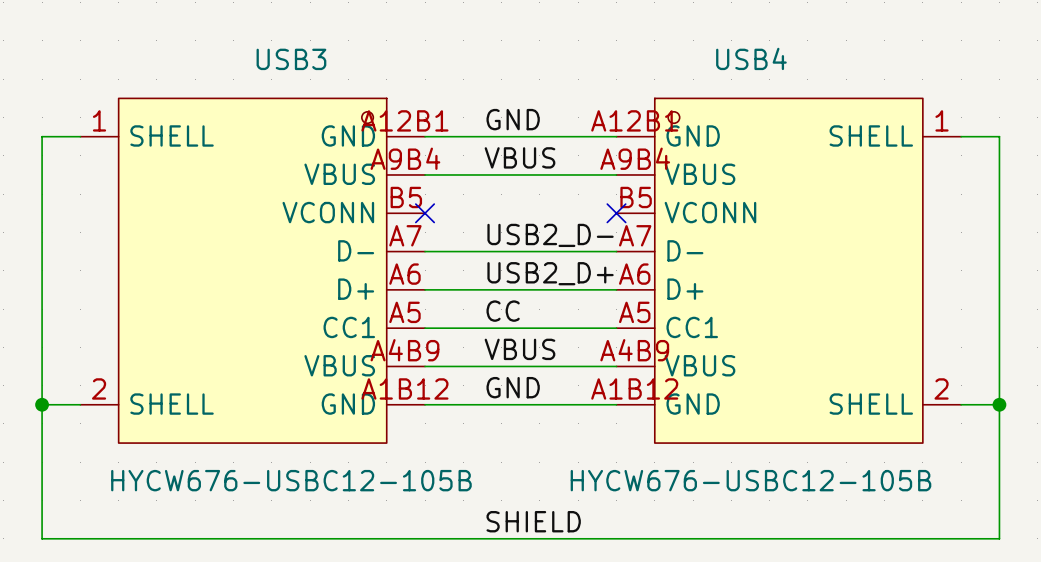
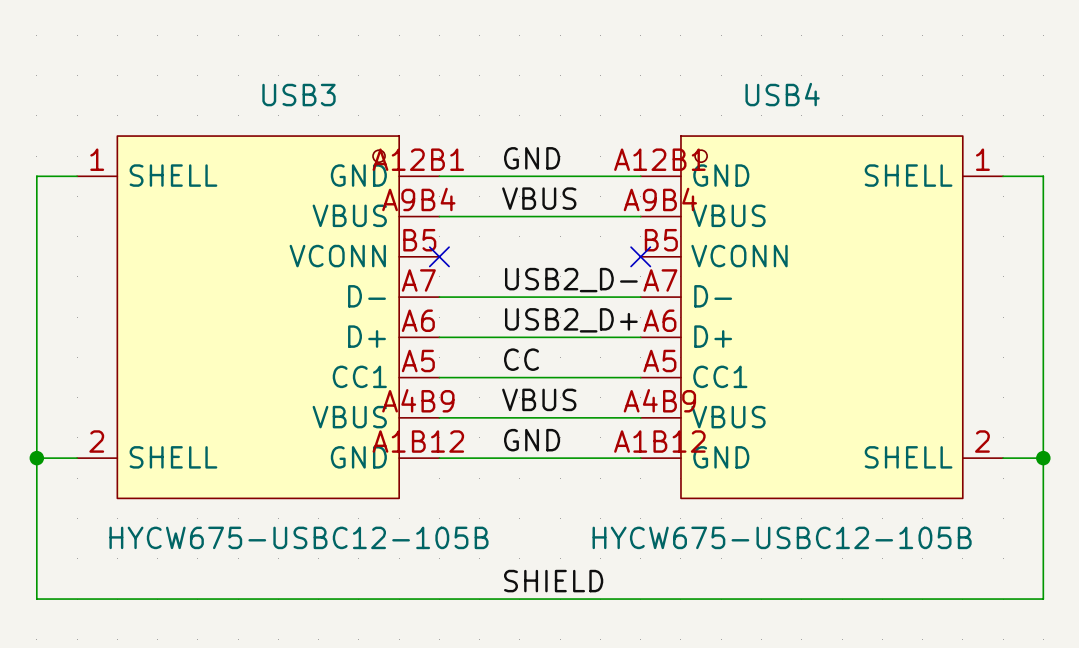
USB3 value: HYCW676-USBC12-105B (291, 480) -> HYCW675-USBC12-105B (298, 537)
USB4 value: HYCW676-USBC12-105B (750, 480) -> HYCW675-USBC12-105B (782, 537)

